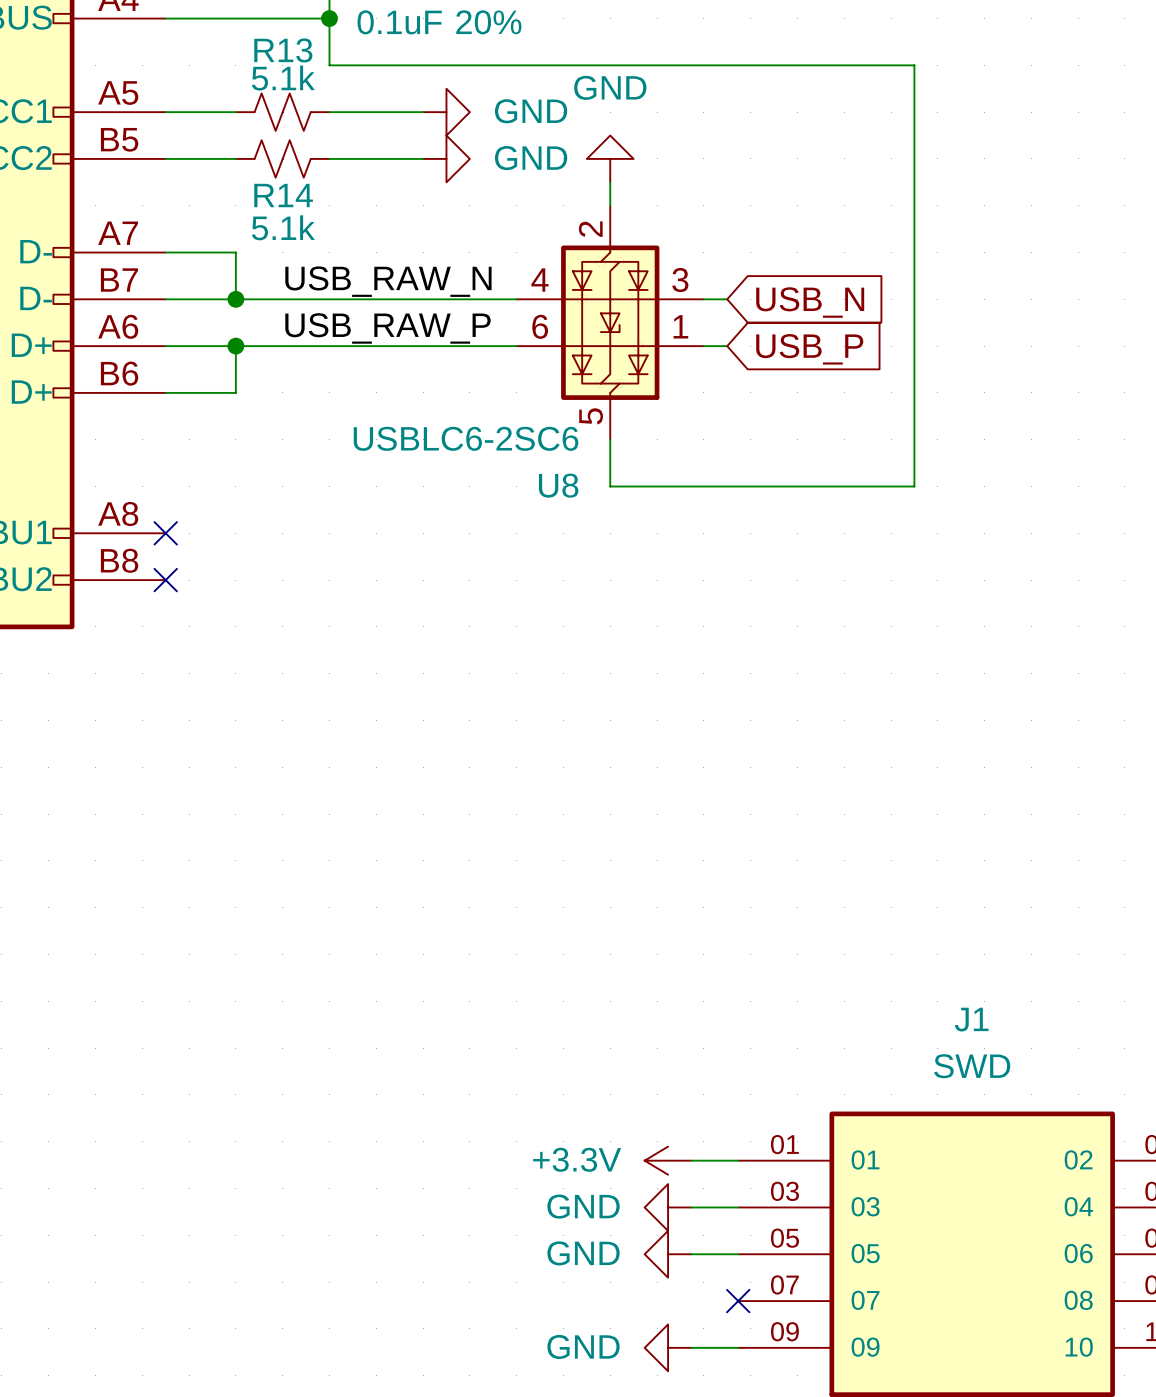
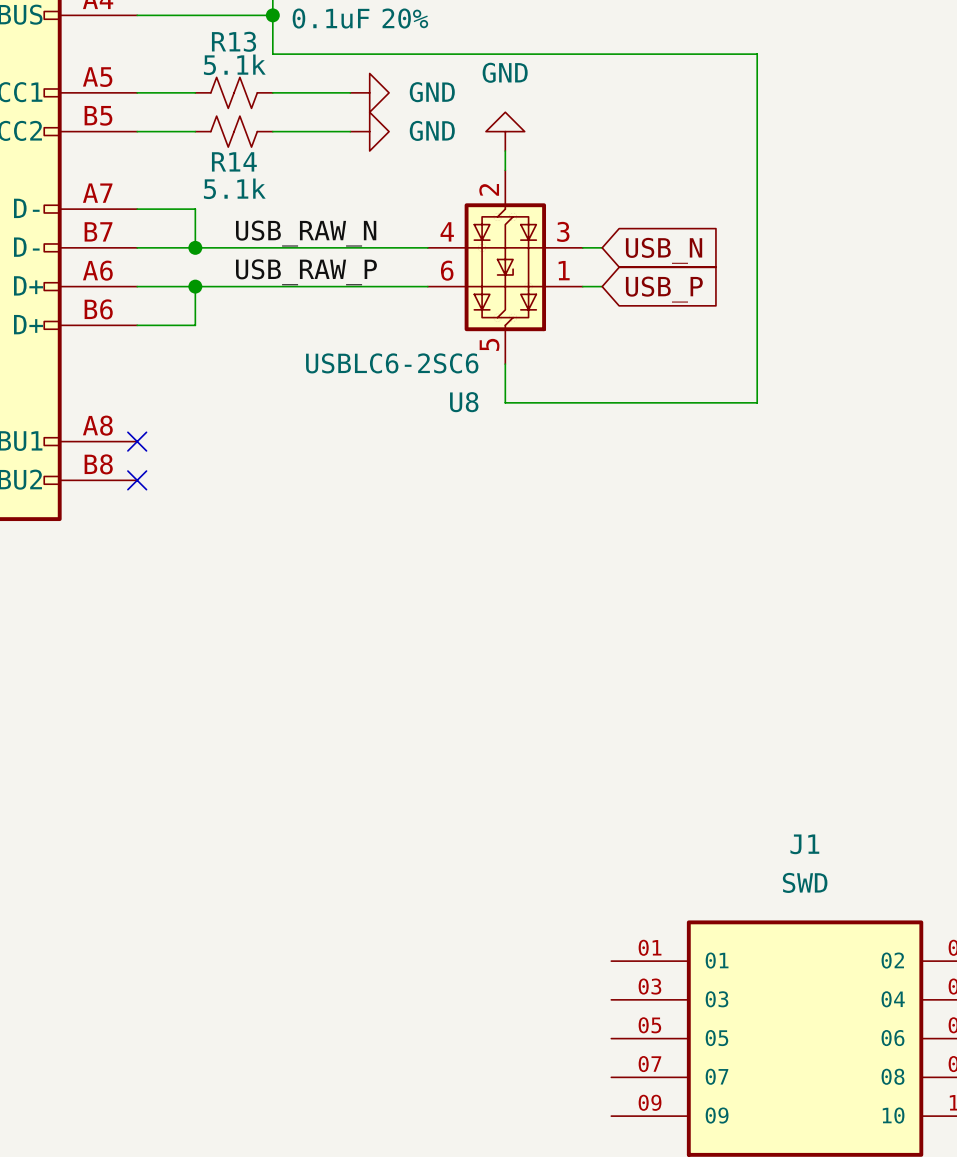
power symbol: +3.3V (668, 1160) -> none
wire: (691, 1160) (738, 1160) -> none
power symbol: GND (668, 1207) -> none
wire: (691, 1207) (738, 1207) -> none
power symbol: GND (668, 1254) -> none
wire: (691, 1254) (738, 1254) -> none
no-connect mark: (738, 1301) -> none
power symbol: GND (668, 1347) -> none
wire: (691, 1347) (738, 1347) -> none

